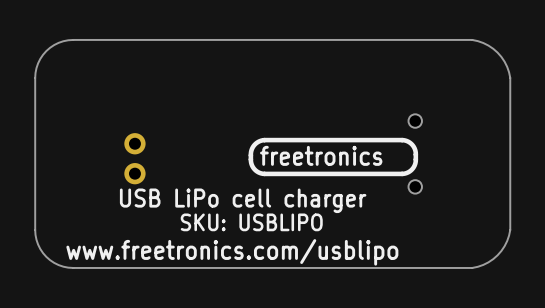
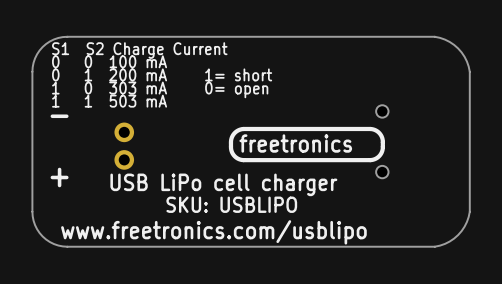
text: none -> S1 S2 Charge Current (139, 50)
text: none -> 0 0 100 mA (109, 61)
text: none -> 0 1 200 mA (109, 74)
text: none -> 1= short (238, 74)
text: none -> 1 0 303 mA (109, 88)
text: none -> 0= open (236, 89)
text: none -> 1 1 503 mA (109, 101)
text: none -> - (59, 116)
text: none -> + (59, 177)

